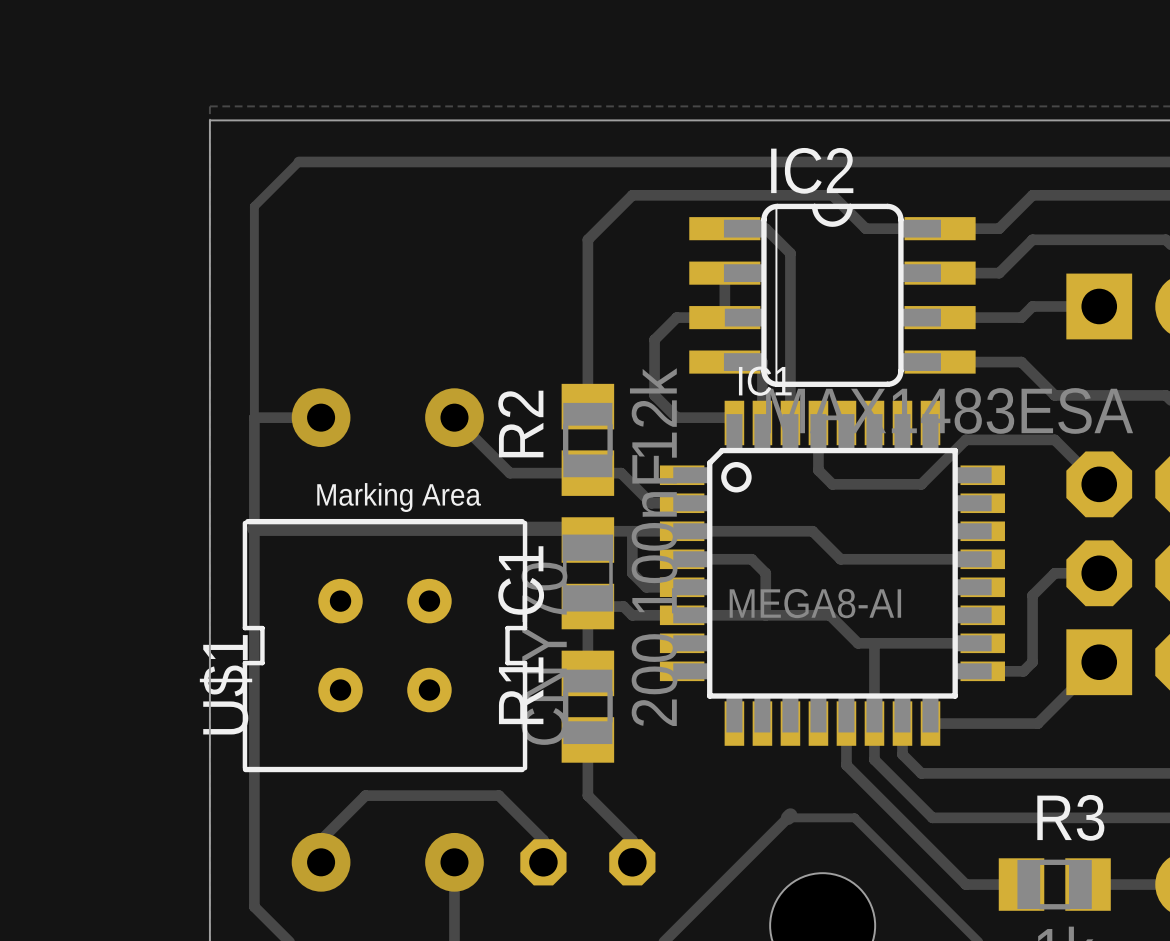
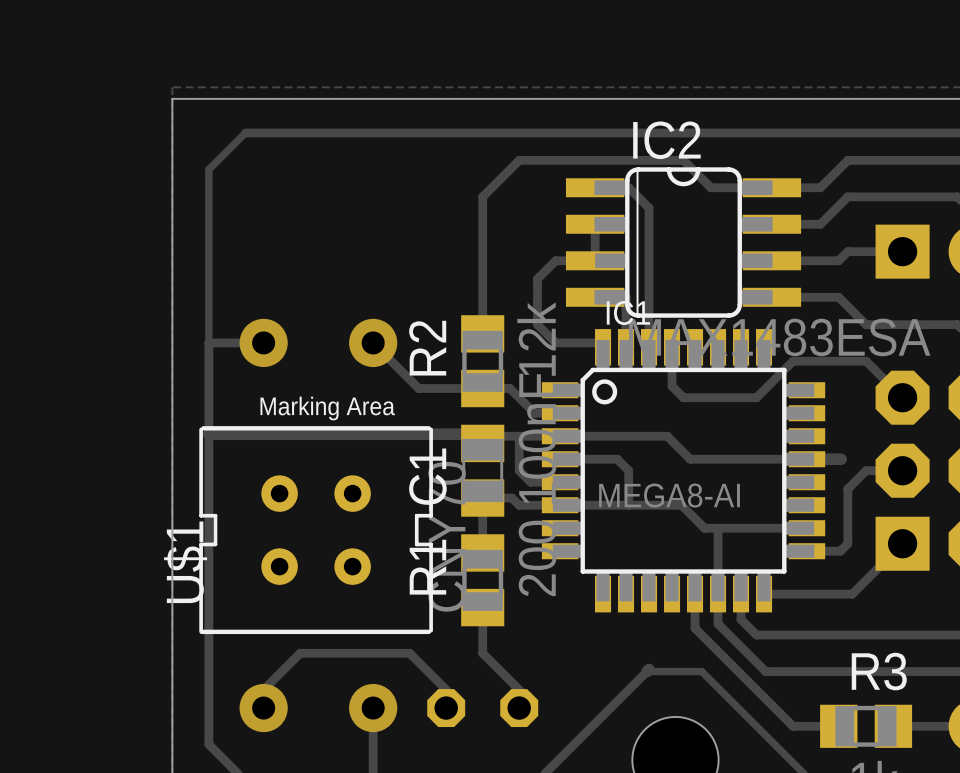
track: none -> (806, 459) (841, 459)

